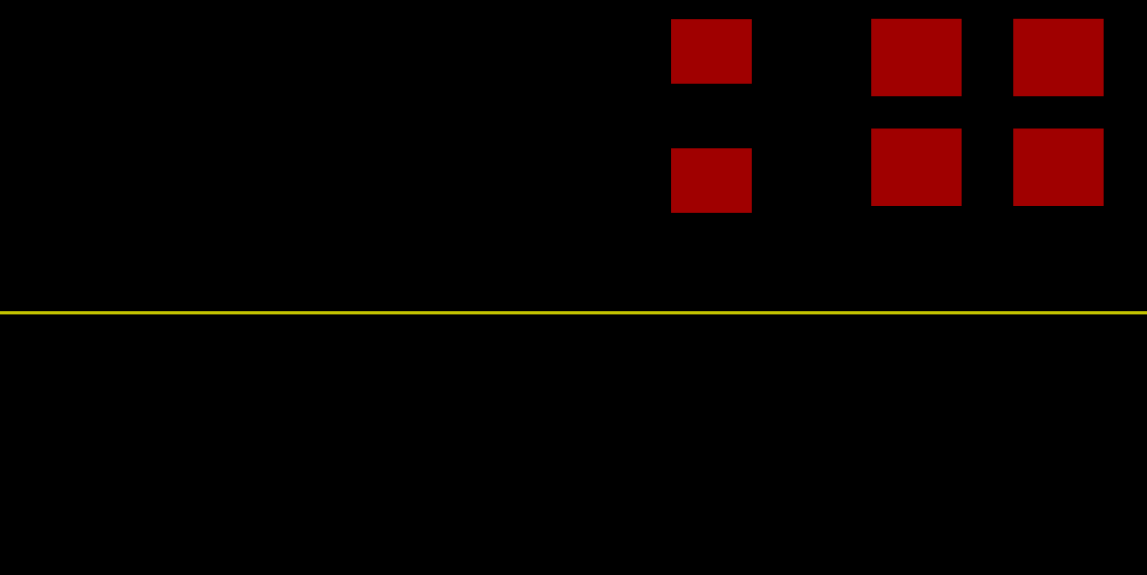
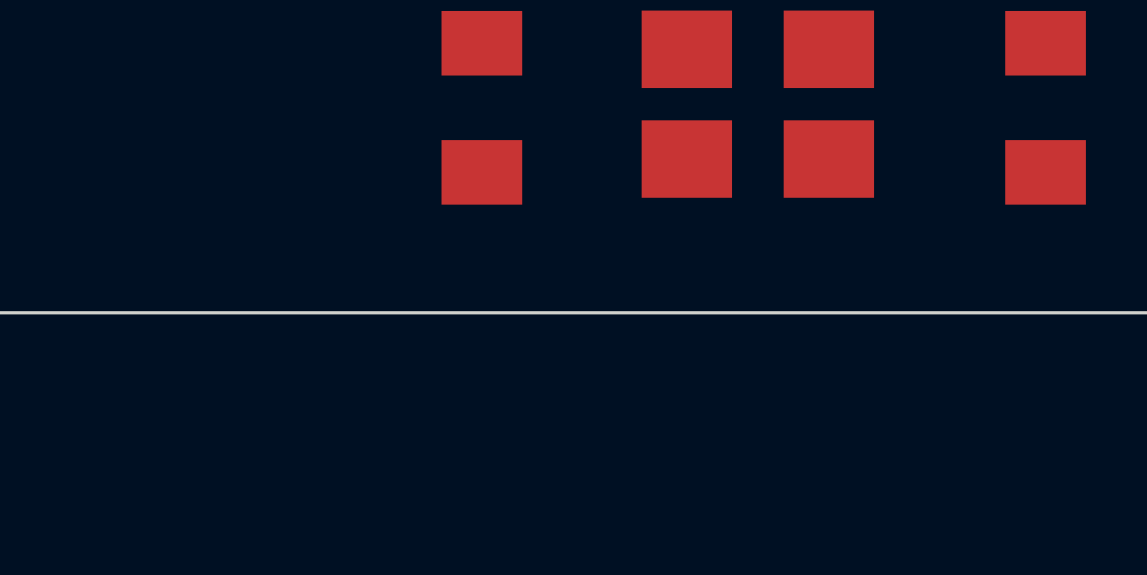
part footprint: [871, 18, 1104, 206] -> [1005, 10, 1086, 205]
part footprint: [671, 19, 752, 213] -> [641, 10, 875, 198]
part: none -> (481, 107)

